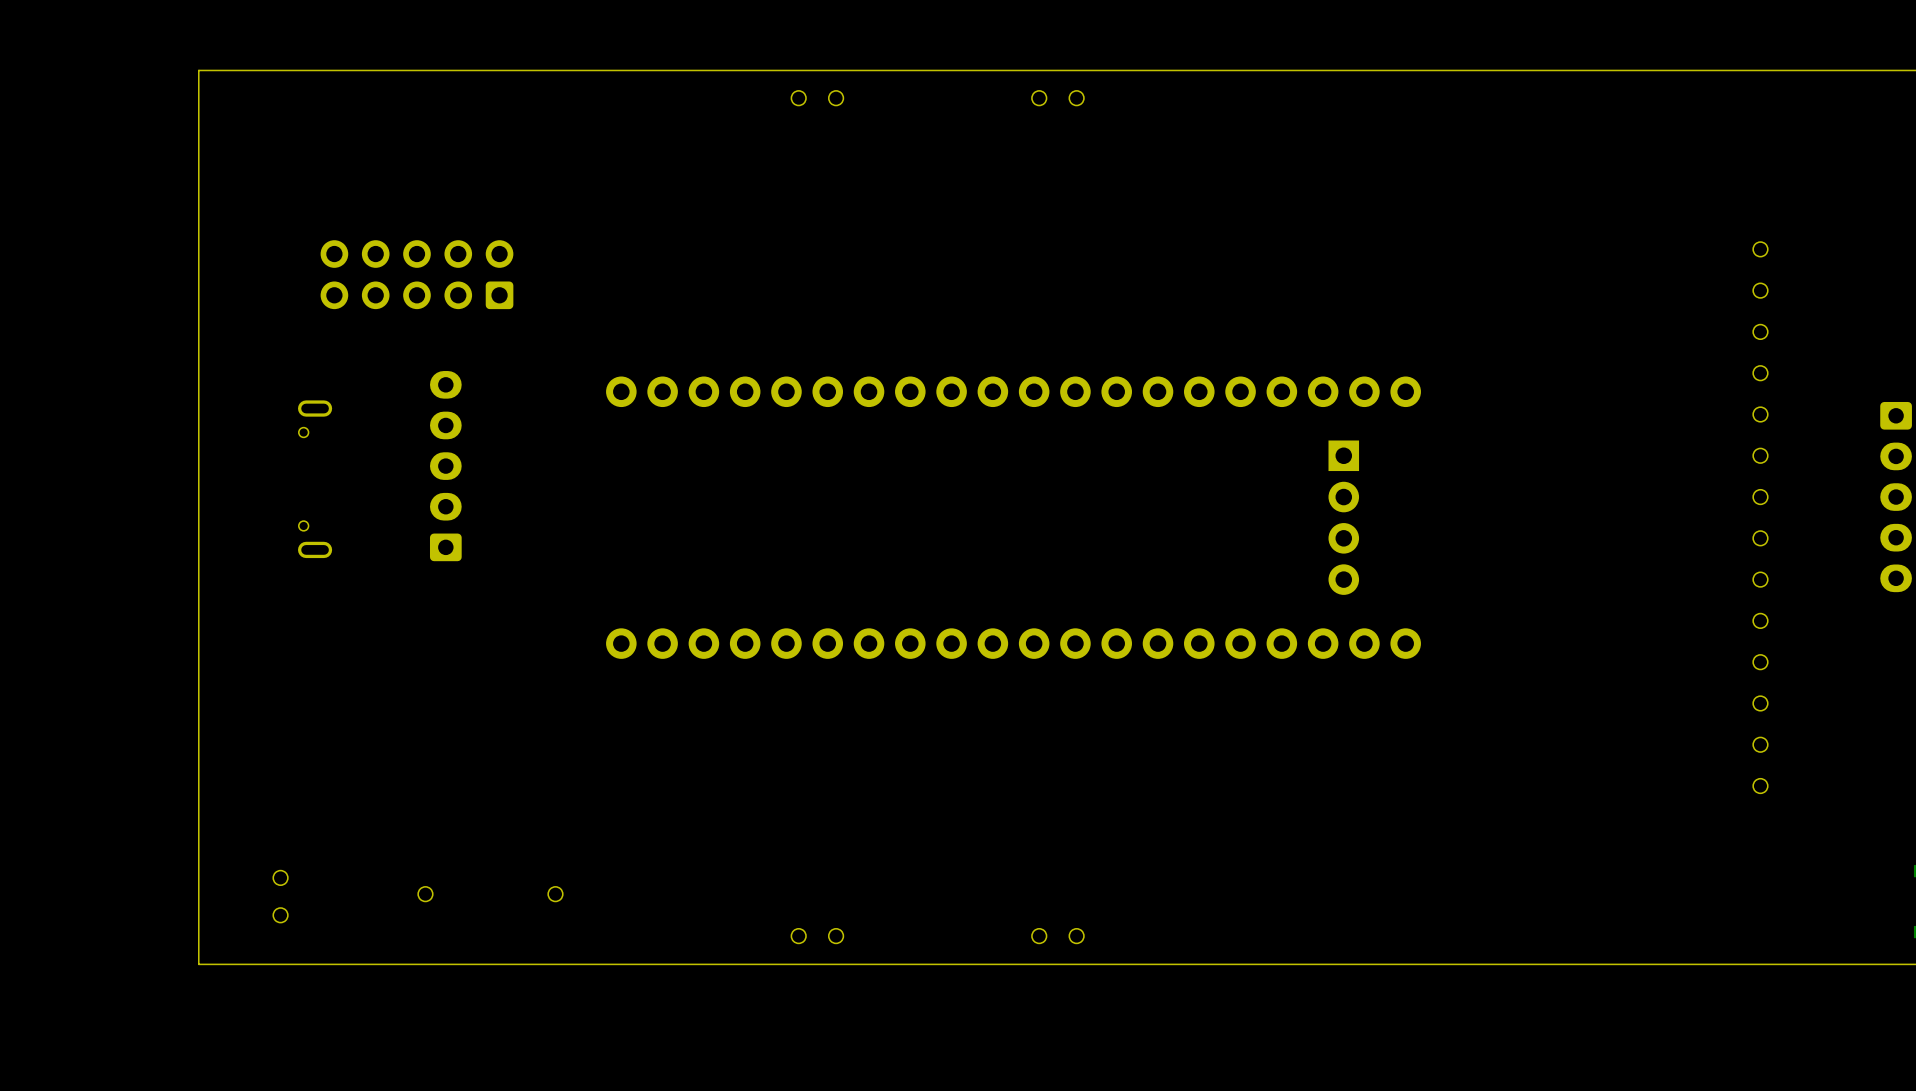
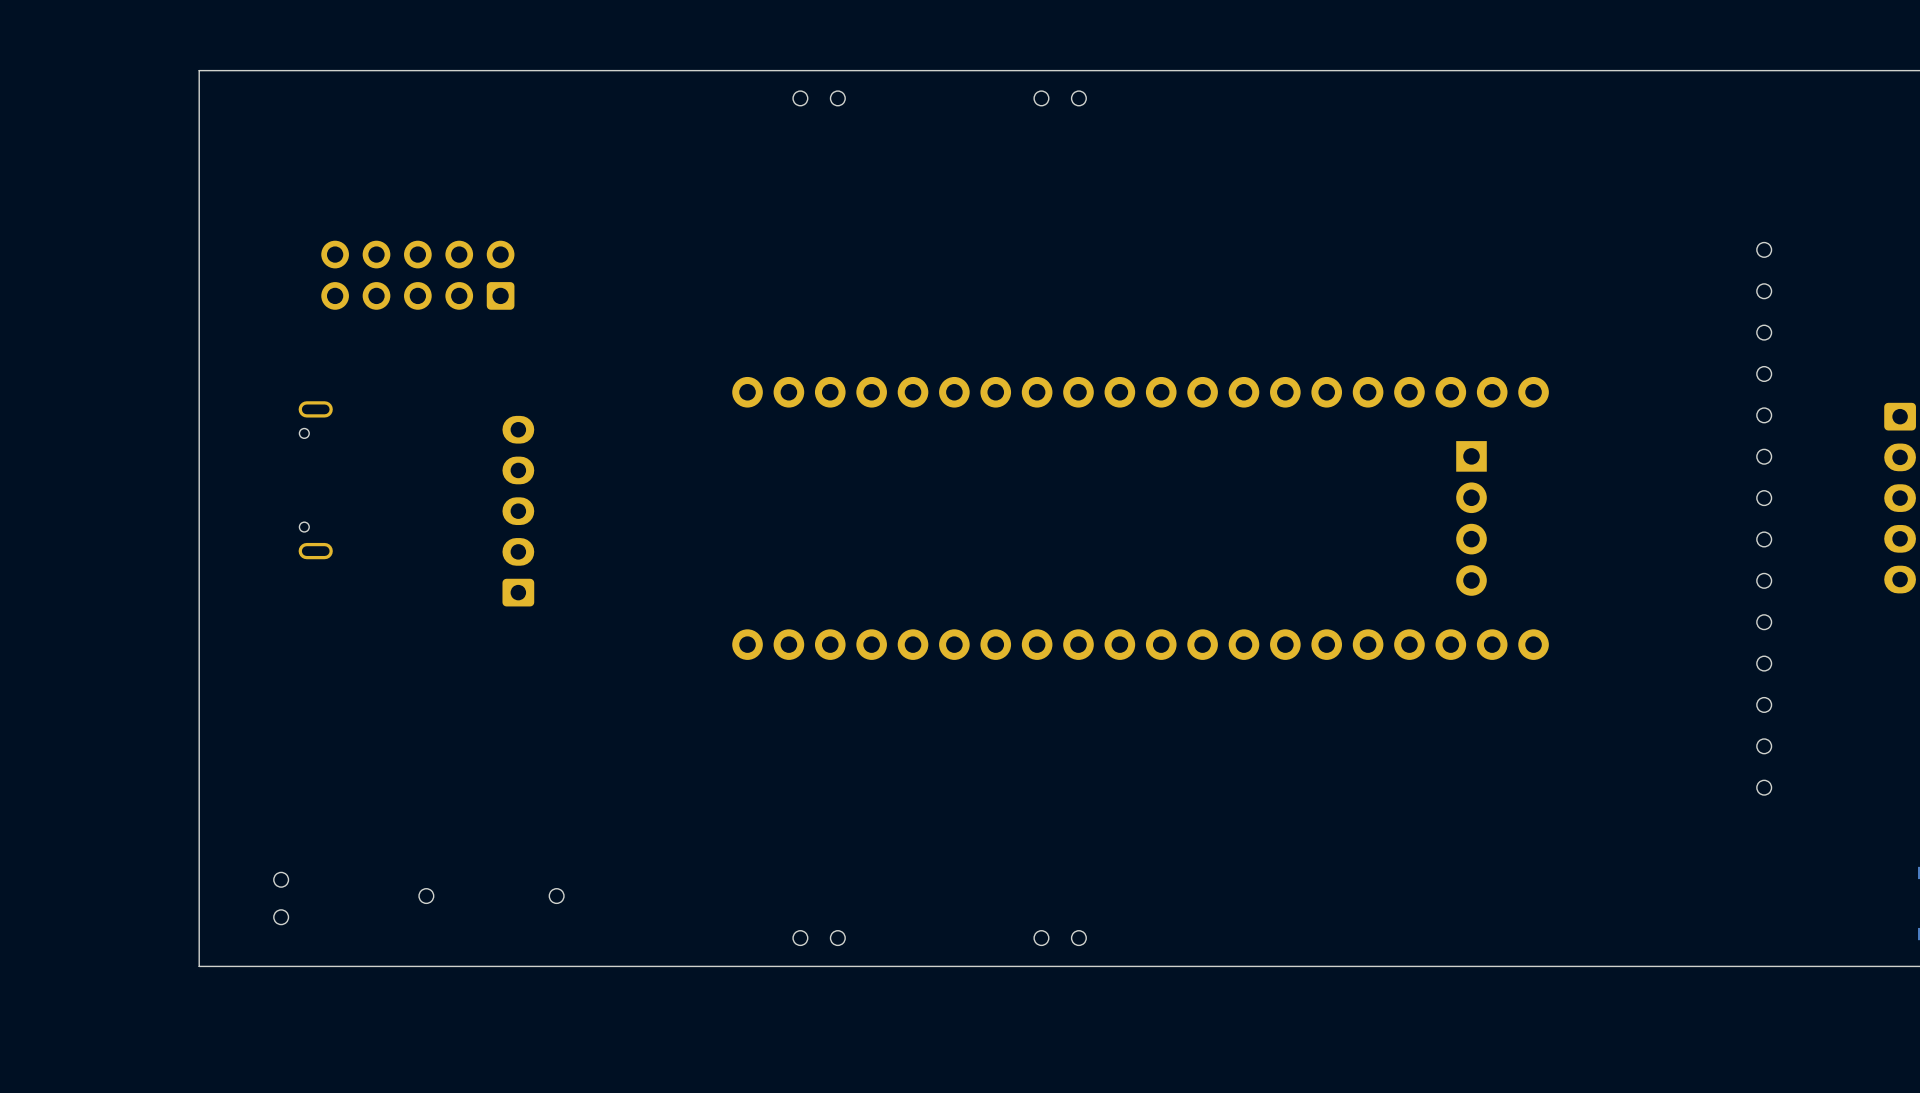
part position: (445, 466) -> (518, 511)
part position: (1013, 517) -> (1140, 518)

